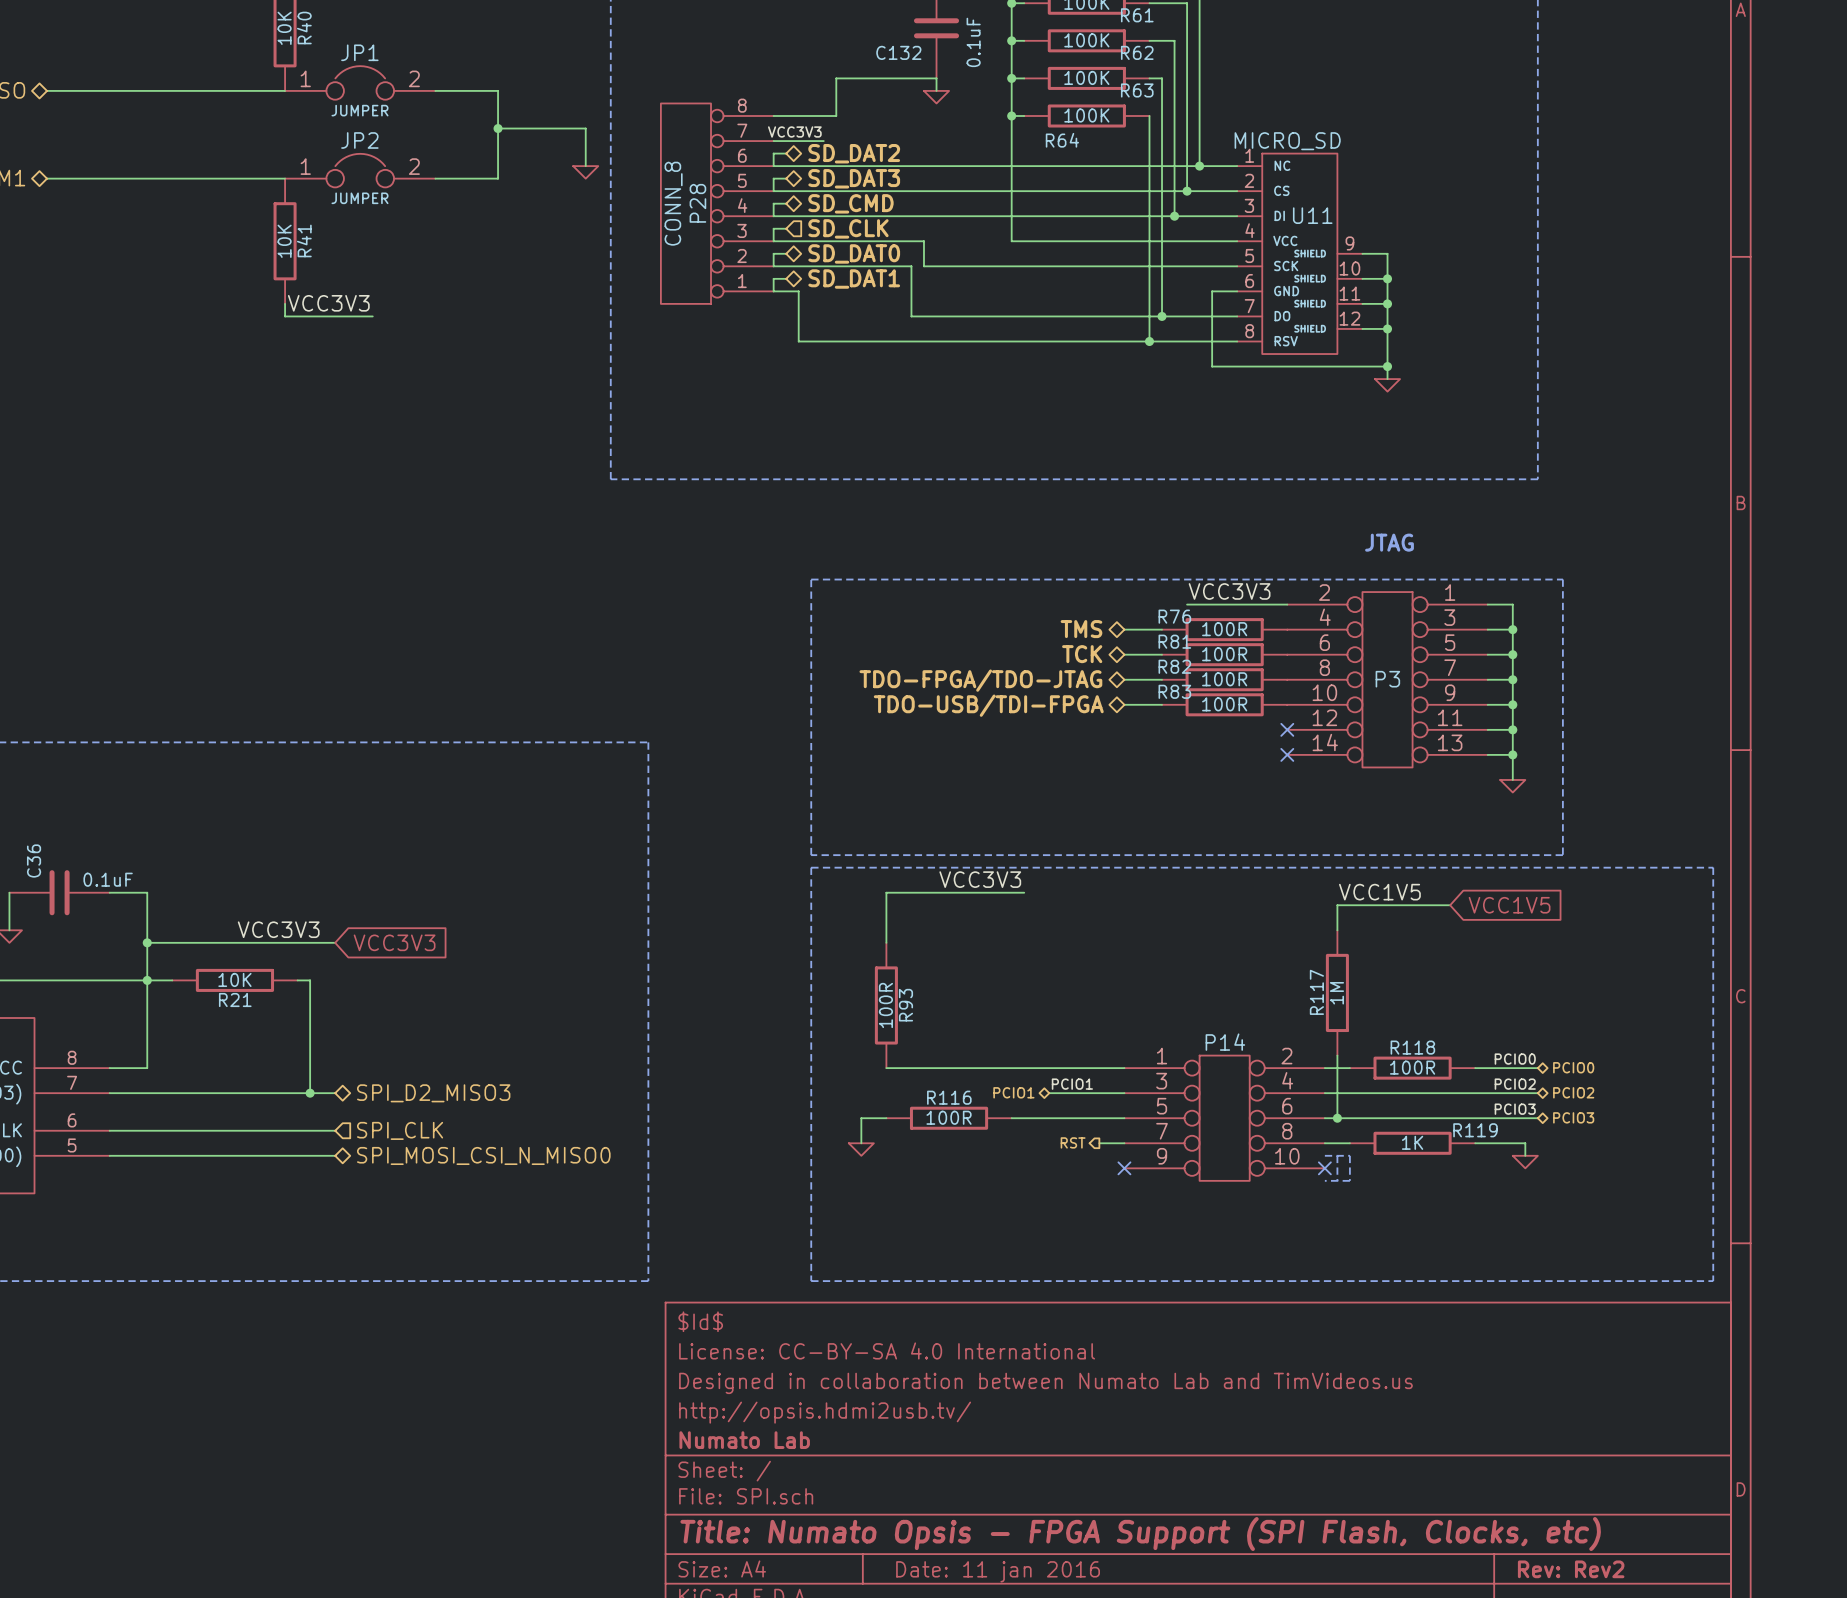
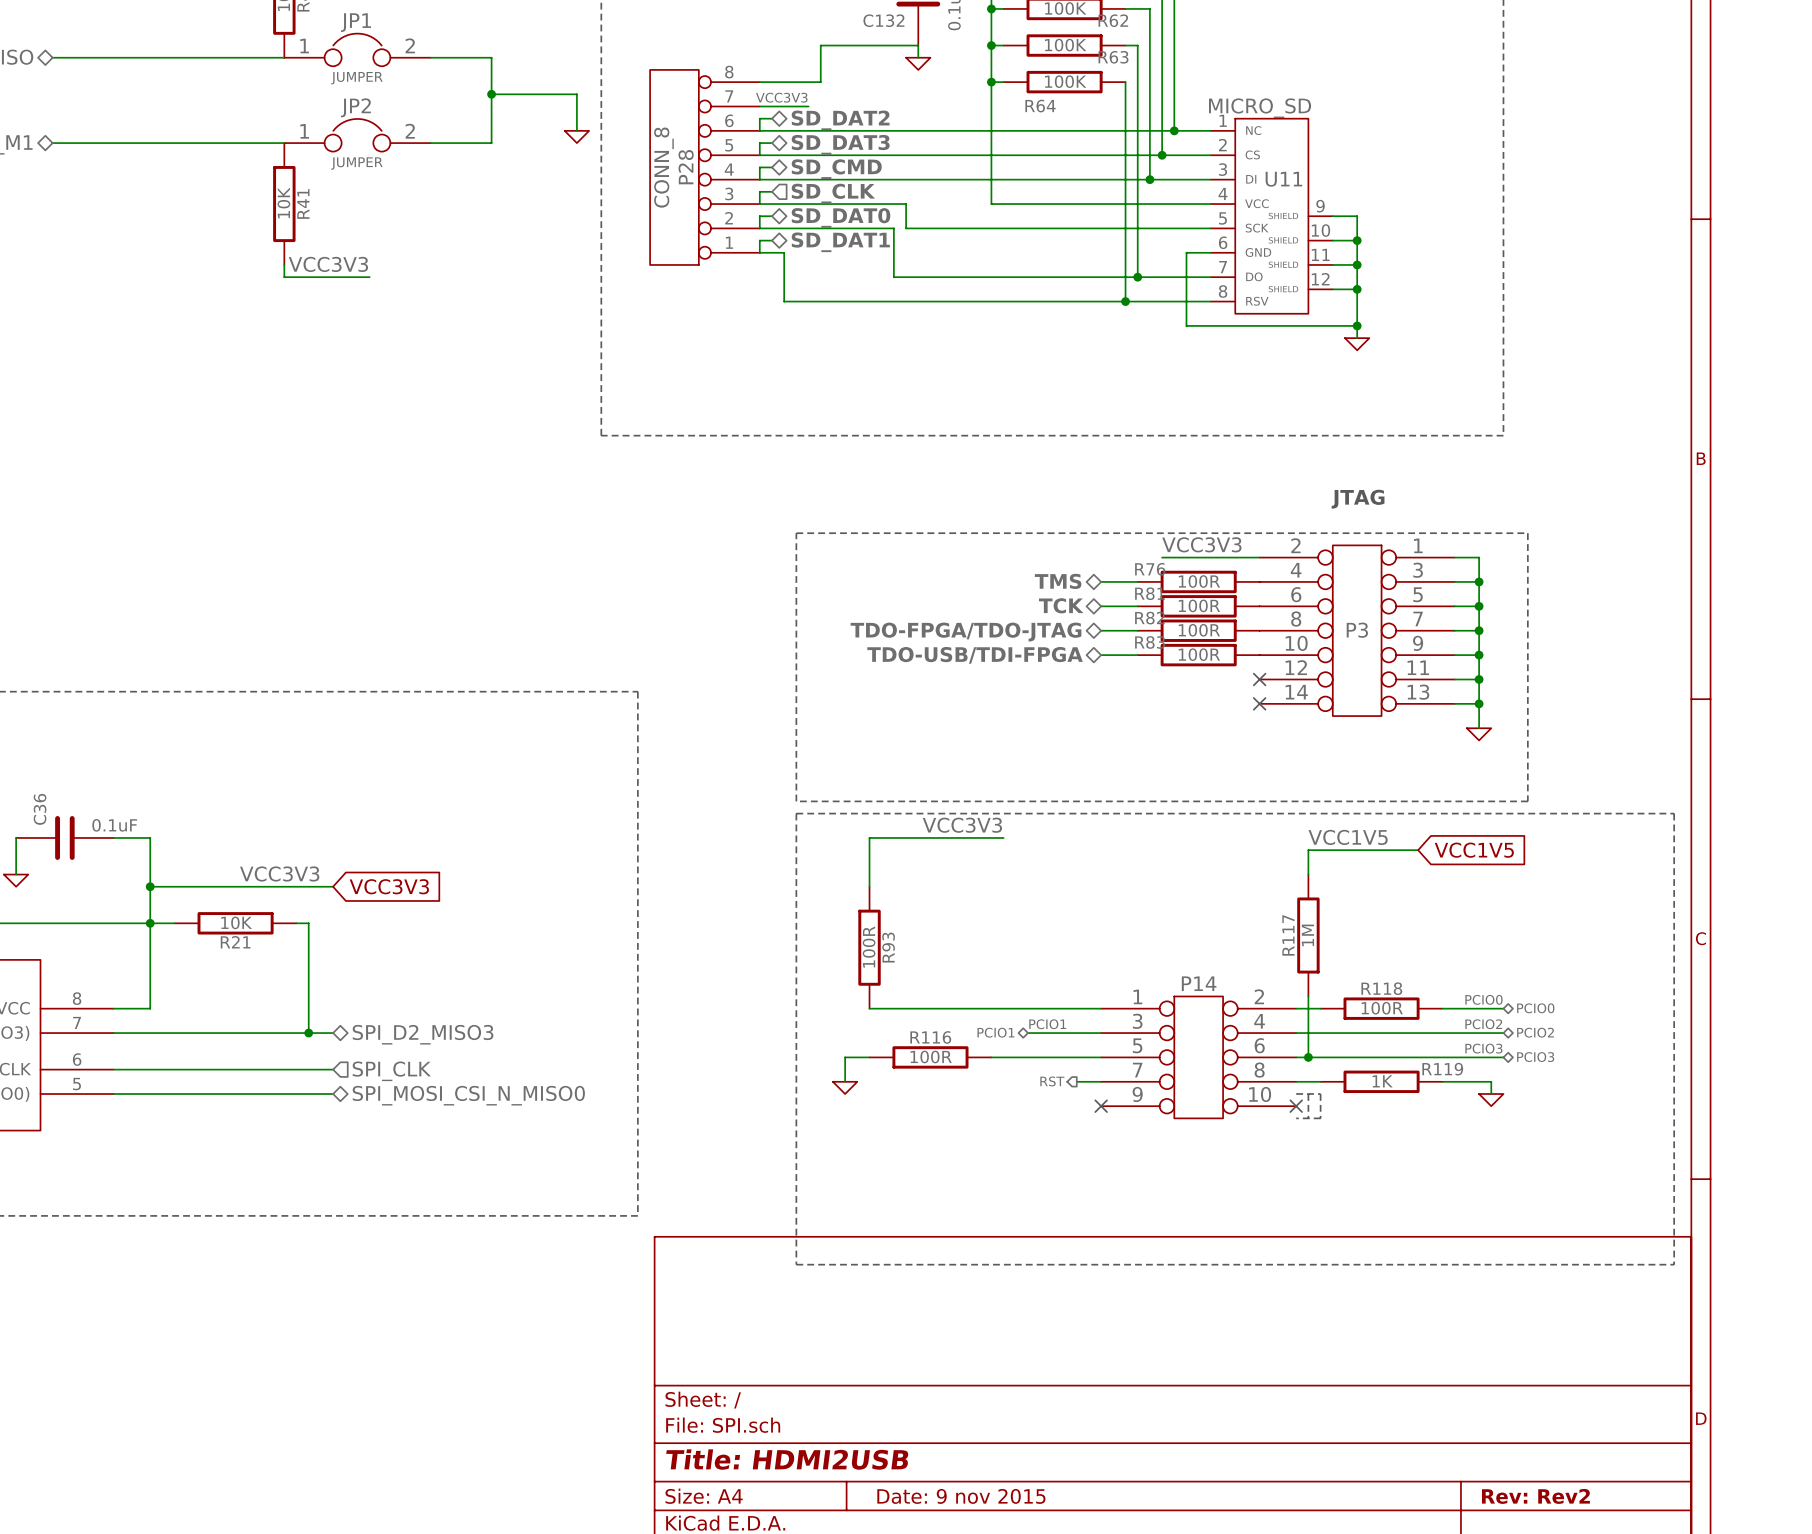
line: (811, 1281) (1713, 1281) -> (796, 1215) (796, 1264) (1674, 1264) (1674, 1215)
title block: $Id$ (700, 1321) -> none
title block: License: CC-BY-SA 4.0 International (887, 1350) -> none
title block: Designed in collaboration between Numato Lab and TimVideos.us (1045, 1383) -> none
title block: http://opsis.hdmi2usb.tv/ (825, 1412) -> none
title block: Numato Lab (744, 1440) -> none
title block: Title: Numato Opsis - FPGA Support (SPI Flash, Clocks, etc) (1140, 1534) -> Title: HDMI2USB (787, 1459)
title block: Date: 11 jan 2016 (998, 1571) -> Date: 9 nov 2015 (961, 1496)

